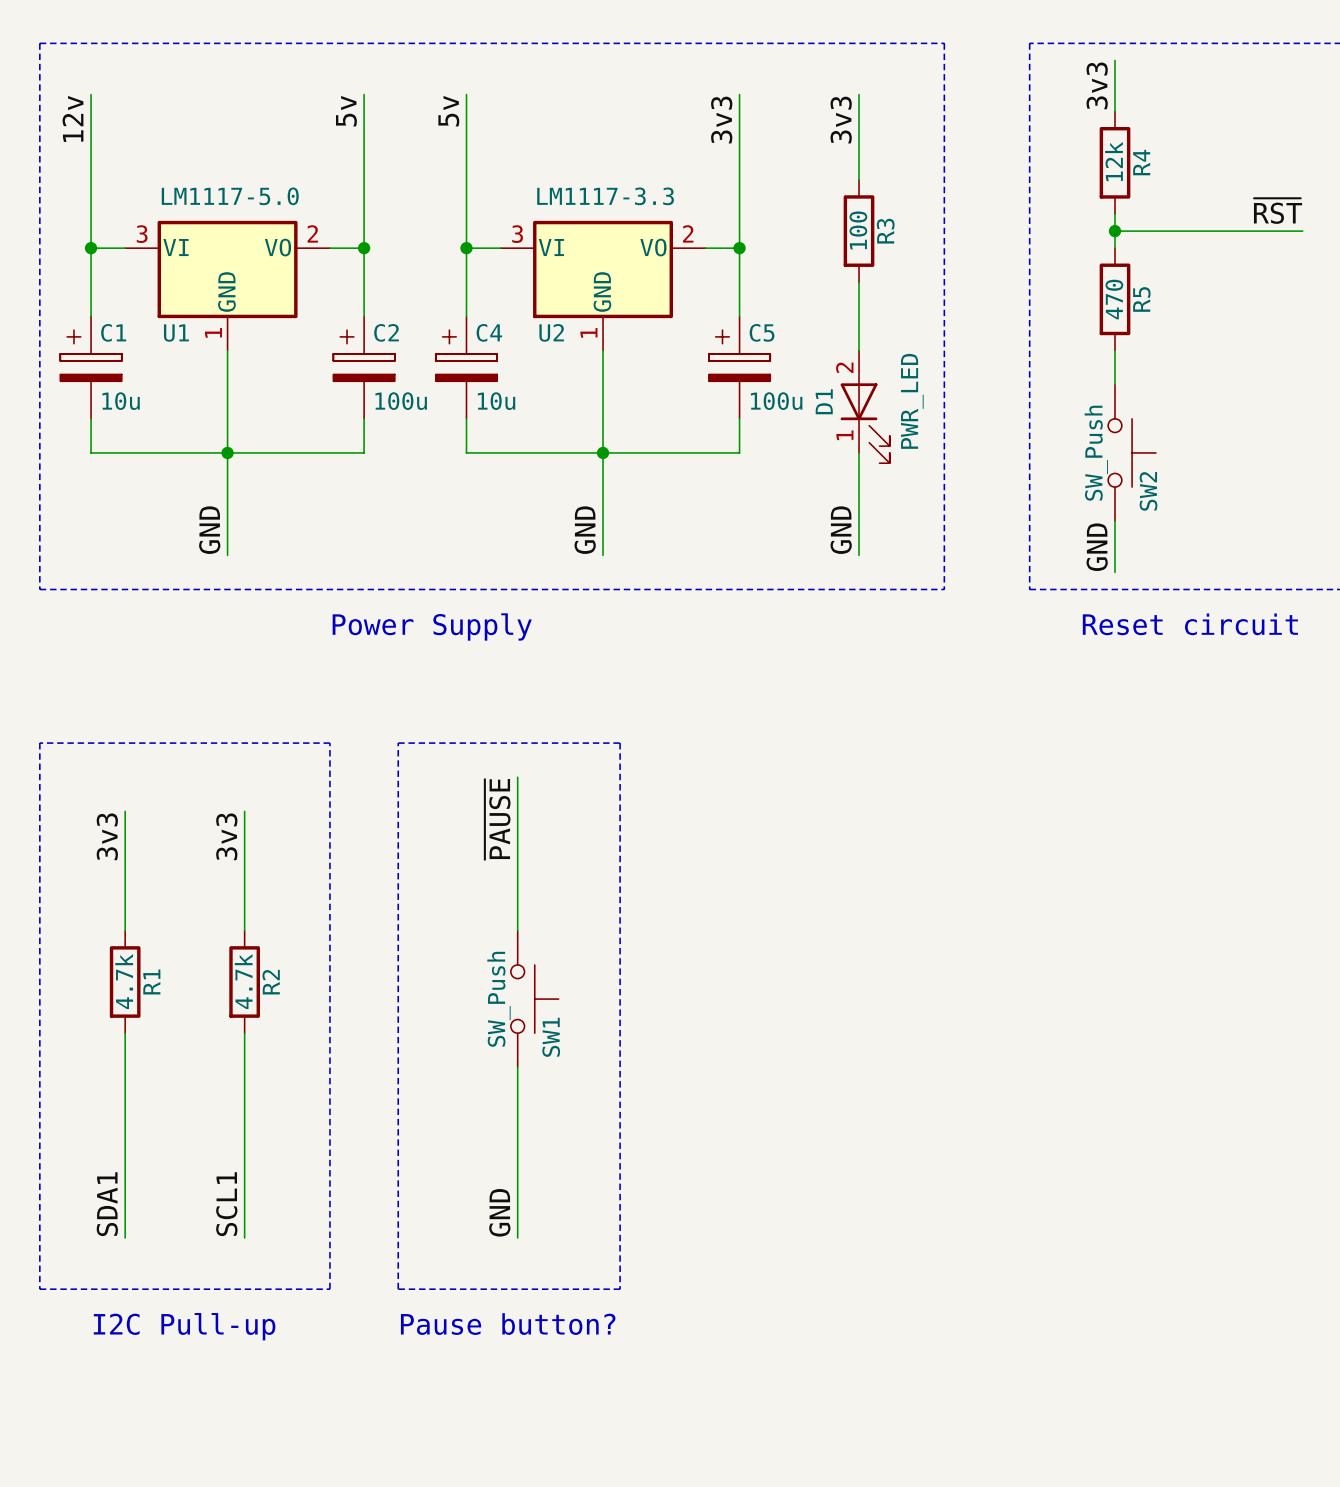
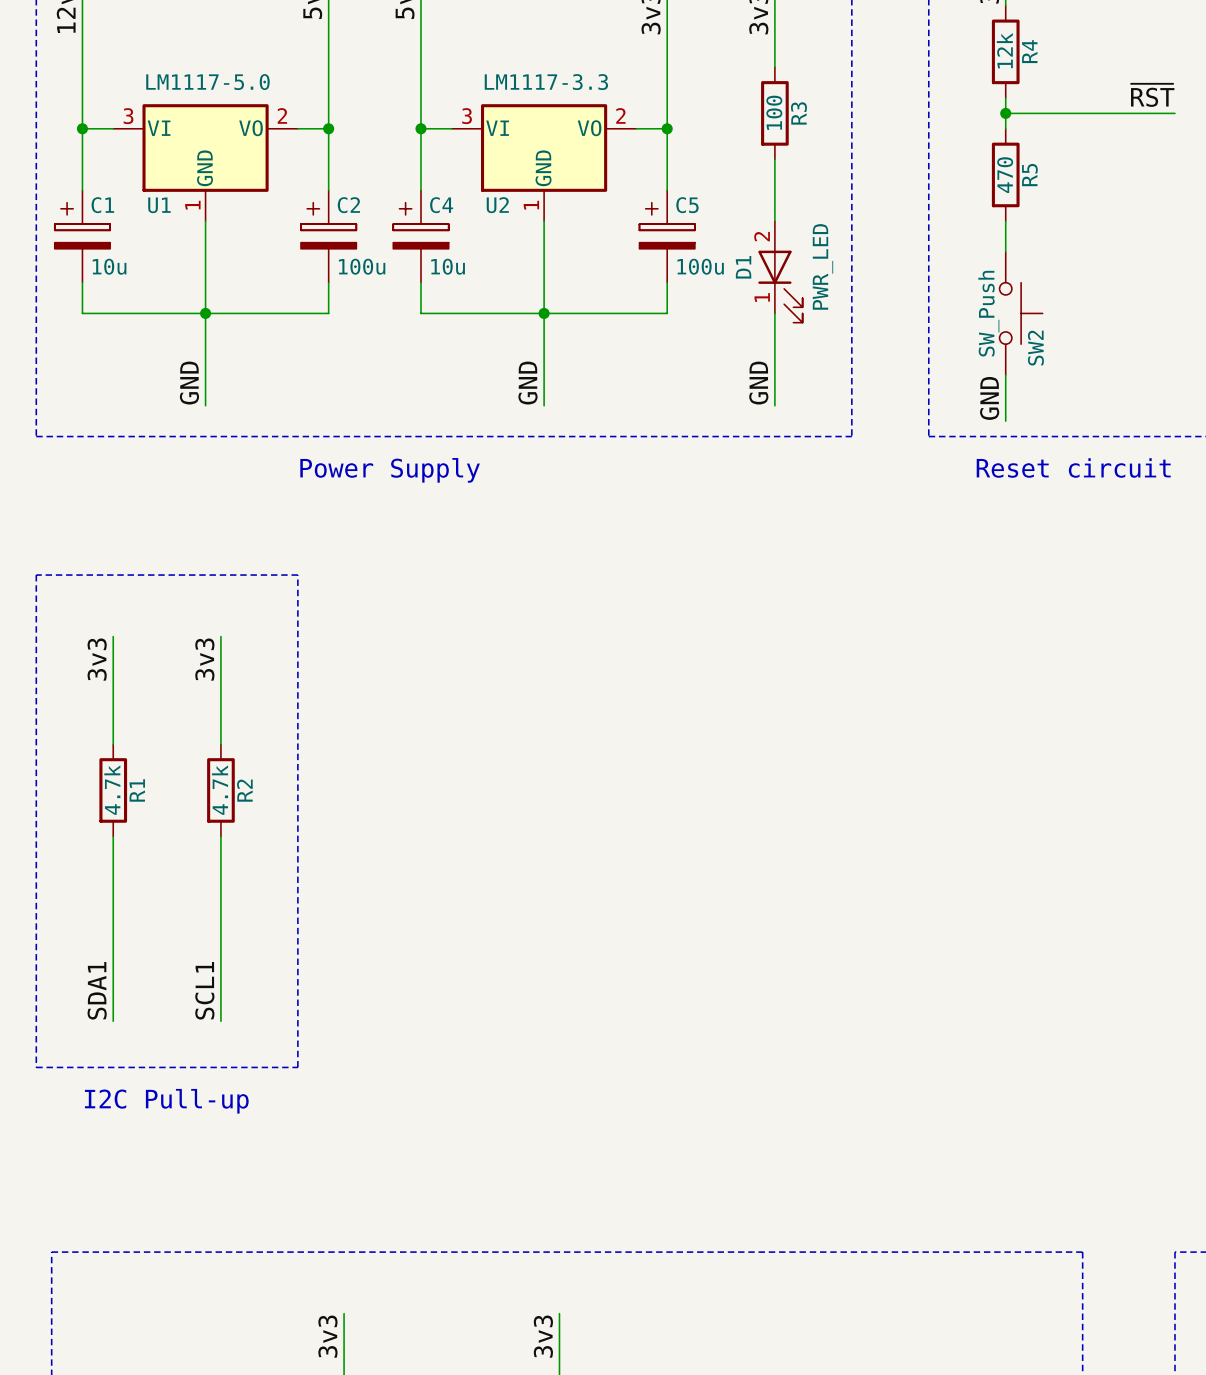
line: (398, 743) (620, 743) (620, 1289) (398, 1289) (398, 743) -> none
wire: (517, 777) (517, 930) -> none
label: ~{PAUSE} (497, 819) -> none
SW1: SW_Push (534, 999) -> none
wire: (517, 1067) (517, 1237) -> none
label: GND (499, 1212) -> none
text: Pause button? (508, 1324) -> none

